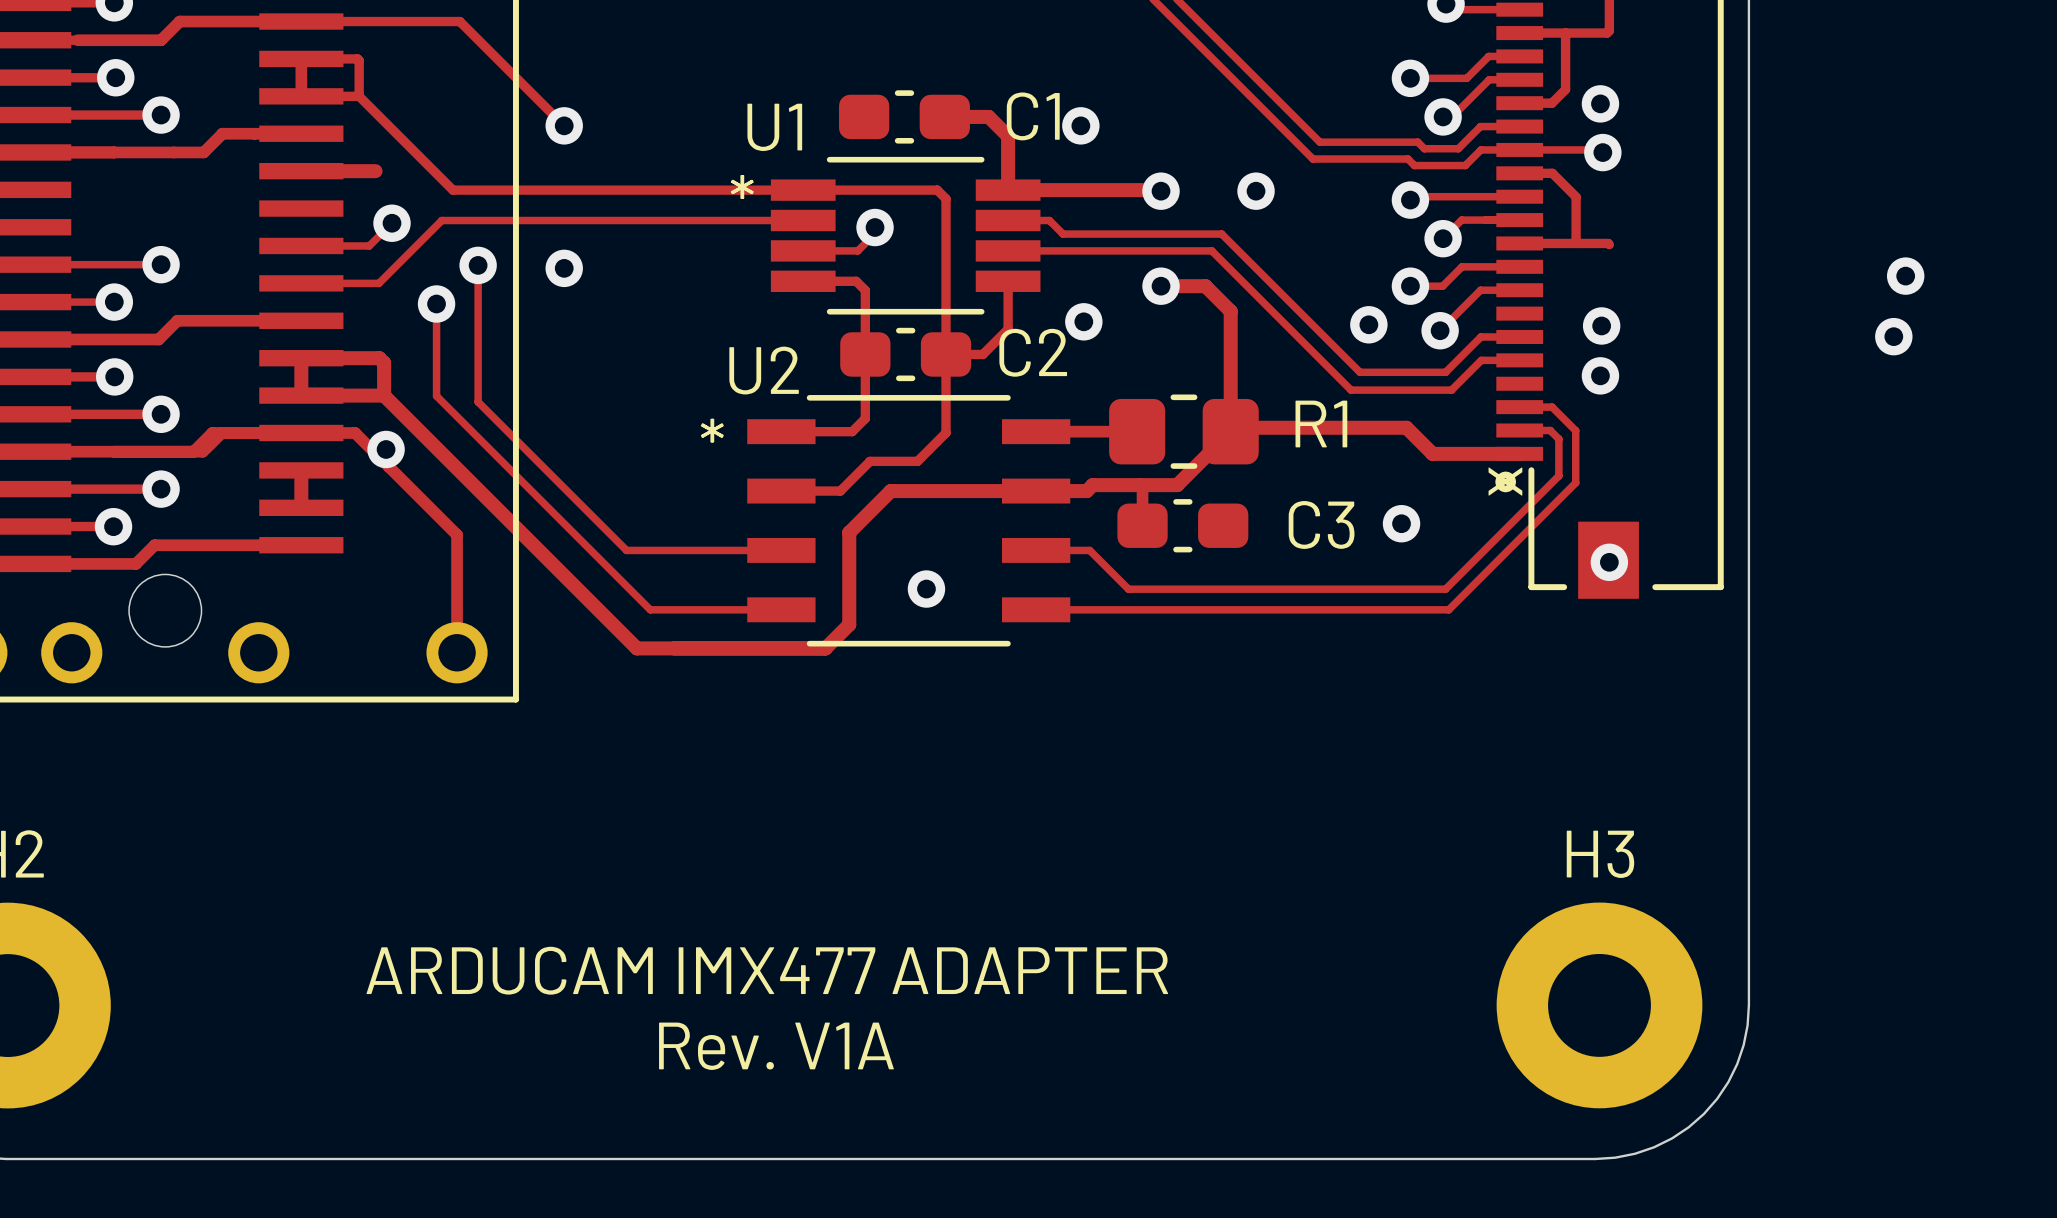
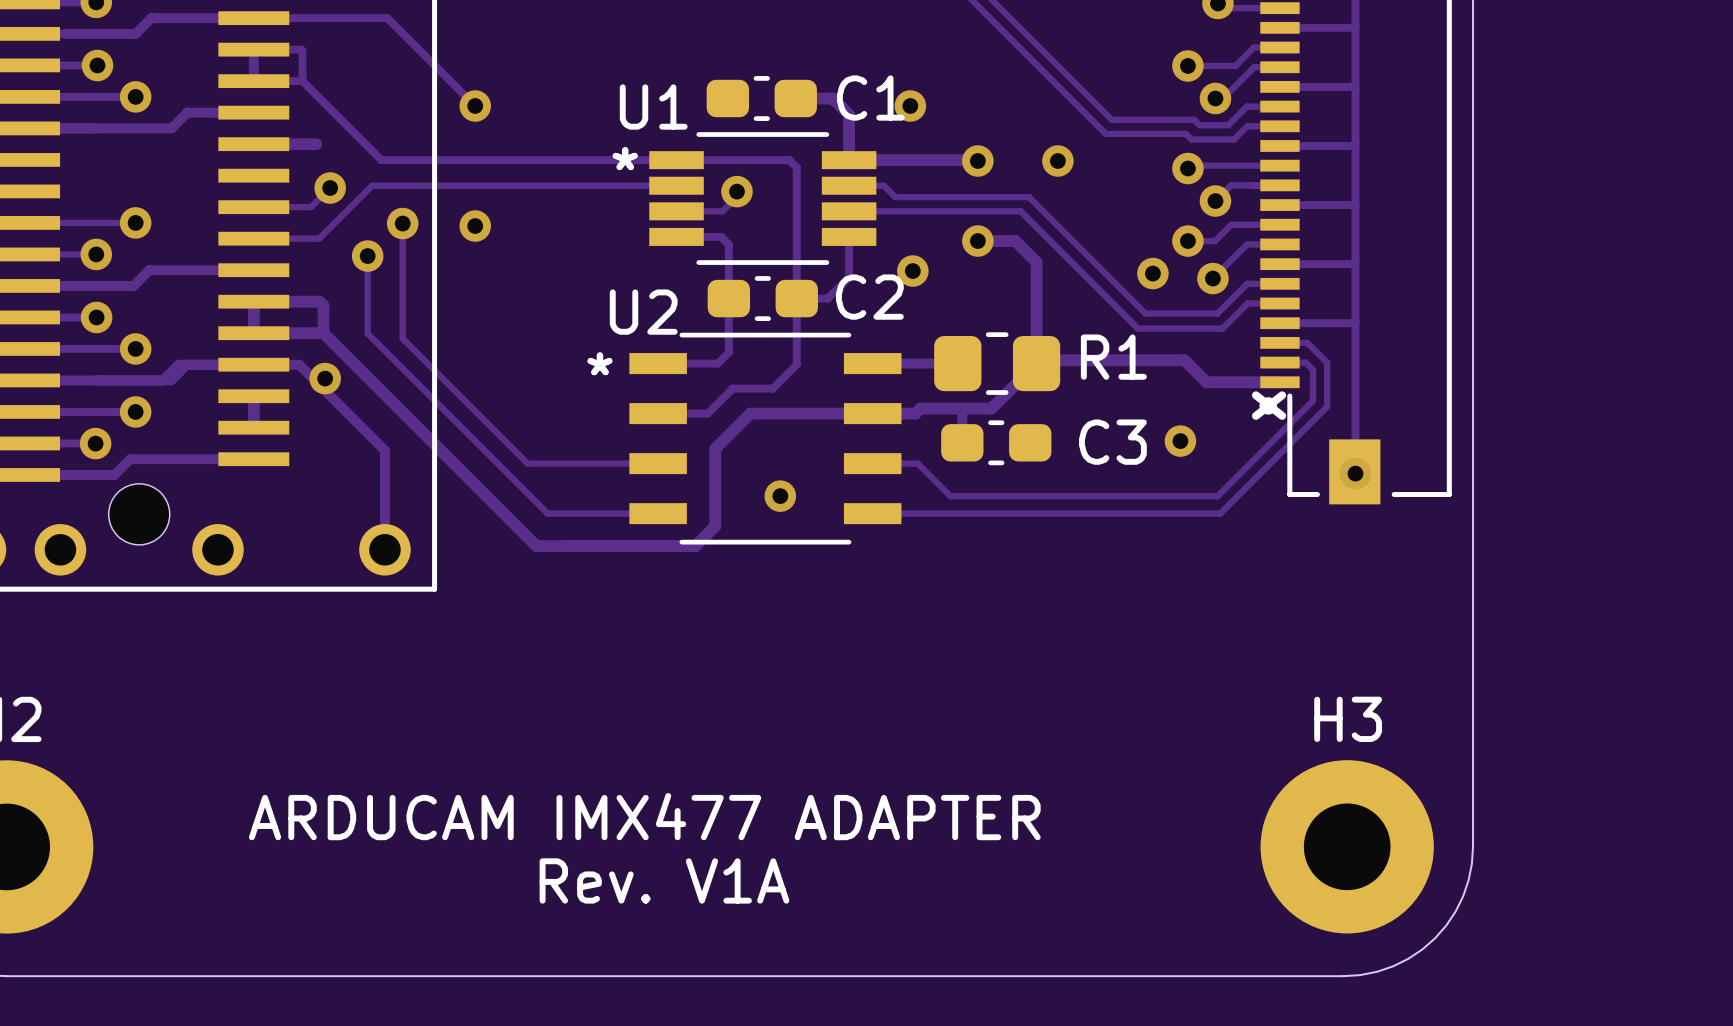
track: none -> (1355, 25) (1355, 471)
track: (1565, 33) (1565, 89) (1551, 103) -> (1355, 88) (1353, 86) (1307, 86)
via: (1600, 103) -> none
track: (1519, 149) (1600, 149) (1602, 152) -> none
via: (1602, 152) -> none
track: (1552, 173) (1576, 196) (1576, 243) -> (1307, 145) (1353, 145) (1355, 143)
via: (1905, 276) -> none
track: none -> (1355, 261) (1352, 264) (1279, 264)
via: (1601, 325) -> none
via: (1893, 336) -> none
via: (1600, 375) -> none
track: none -> (1279, 323) (1353, 323)

